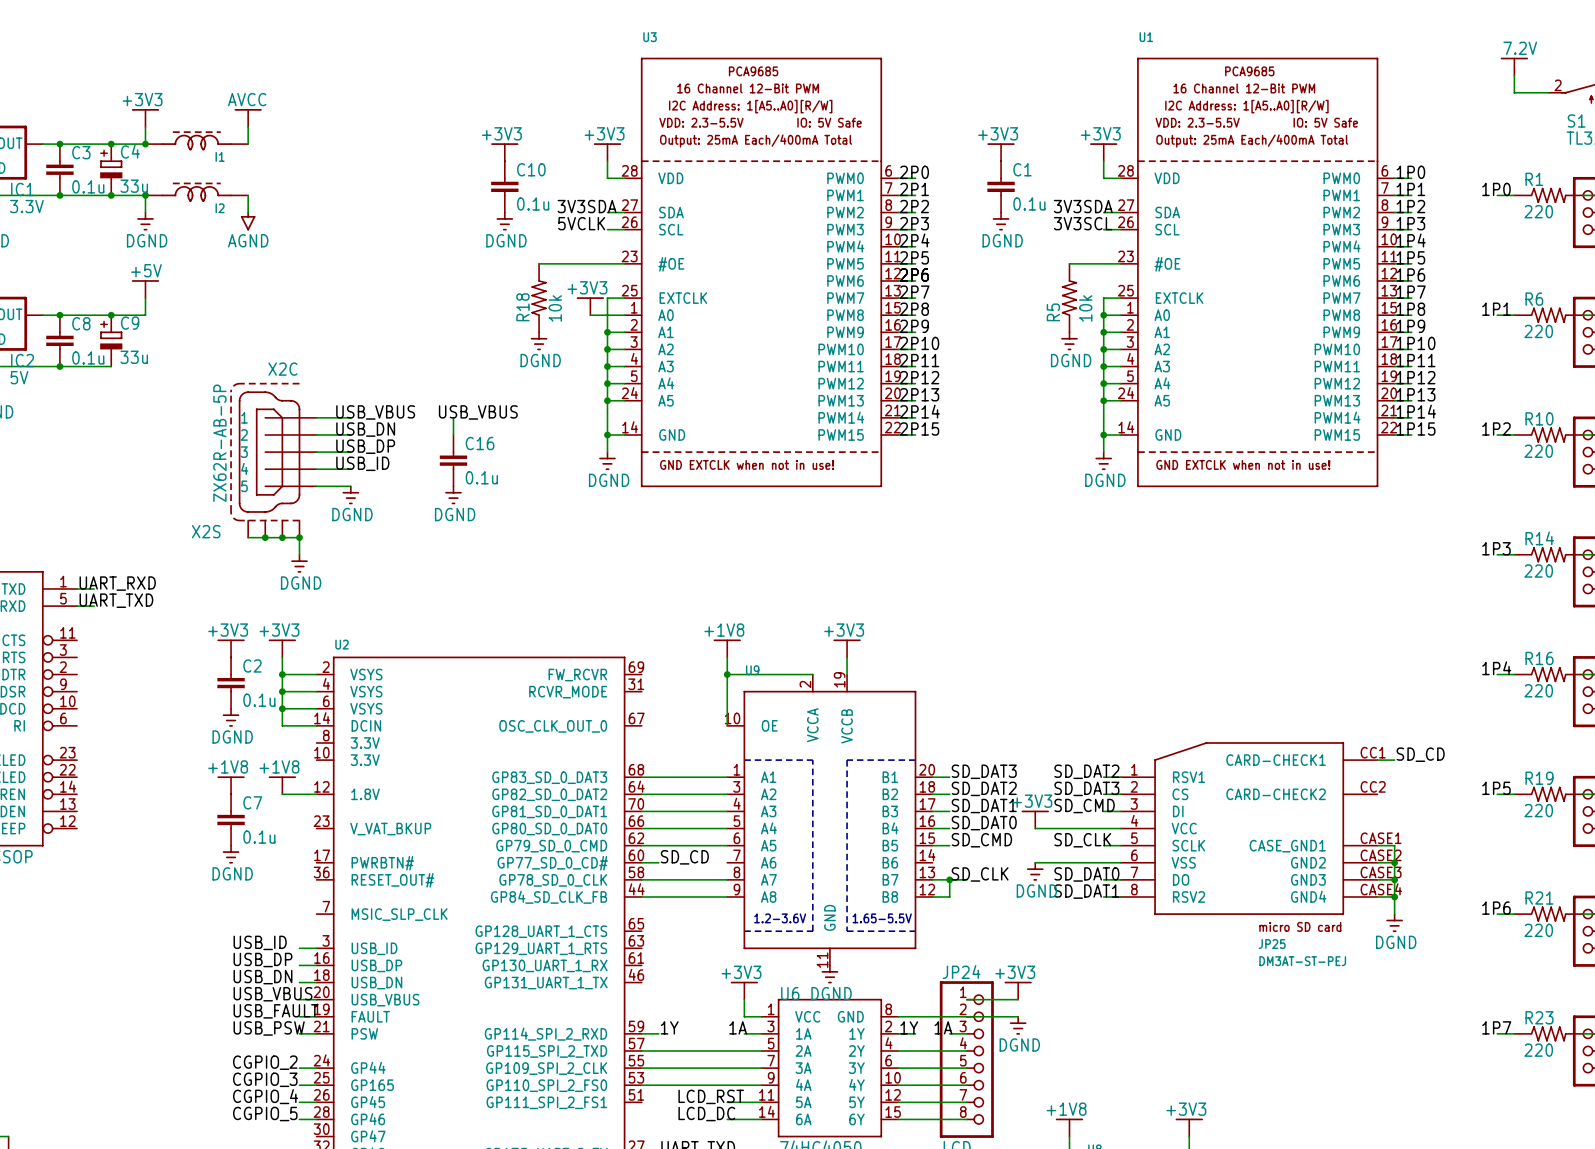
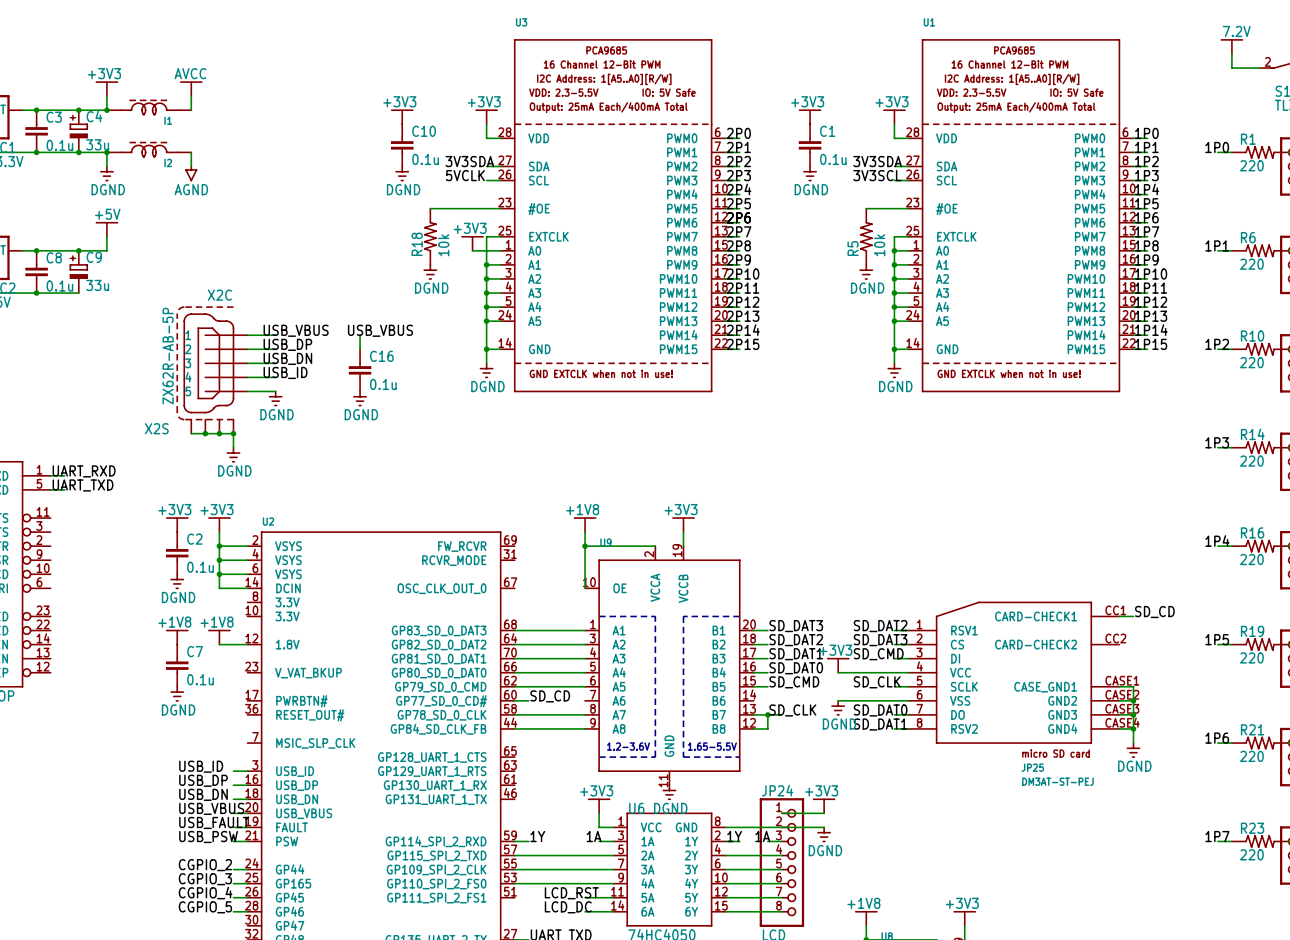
label: USB_DN (365, 429) -> USB_DP (287, 344)
label: USB_DP (365, 446) -> USB_DN (287, 358)

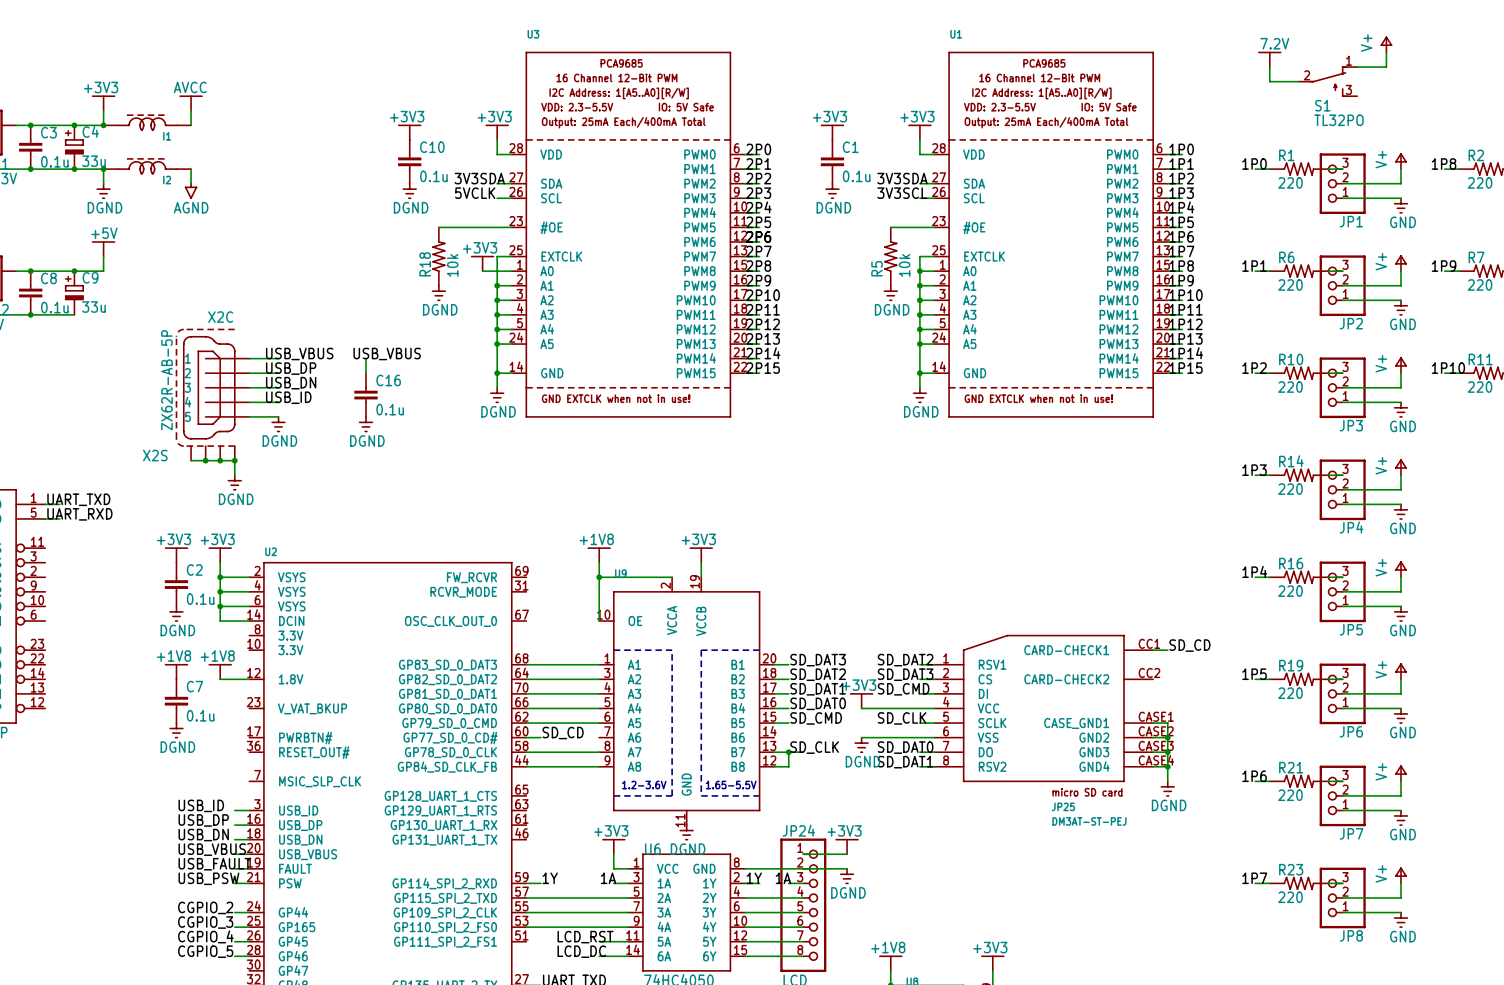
label: UART_RXD (84, 471) -> UART_TXD (78, 499)
label: UART_TXD (83, 485) -> UART_RXD (79, 514)

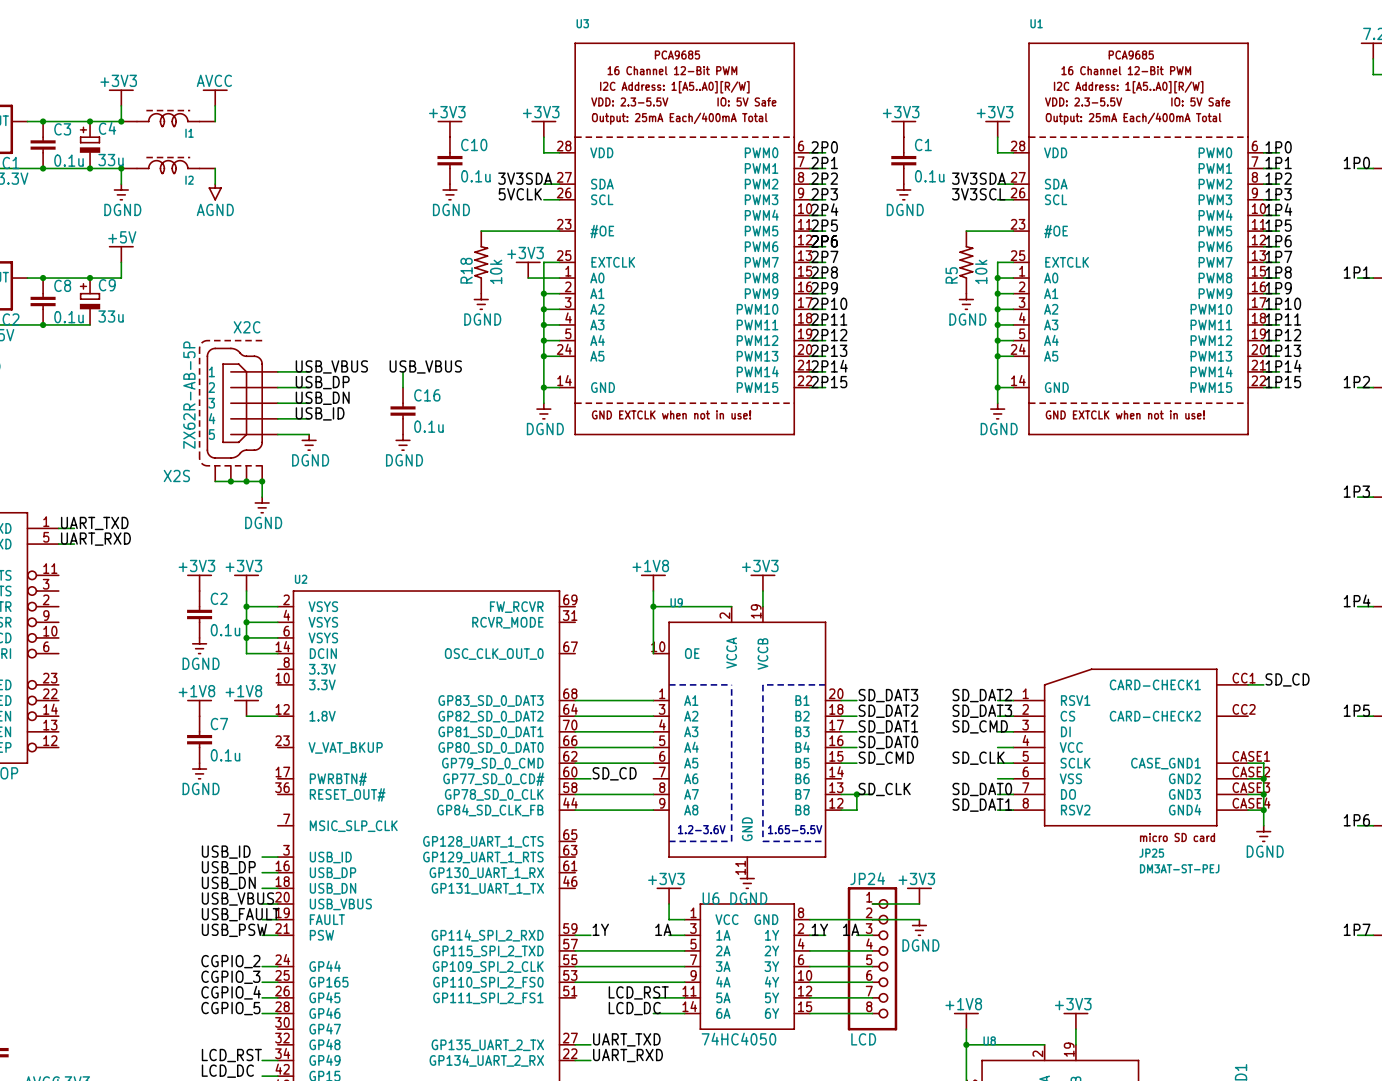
power symbol: +3V3 (861, 700) -> none
wire: (861, 708) (919, 708) -> none
wire: (861, 737) (919, 737) -> none
power symbol: DGND (861, 745) -> none

